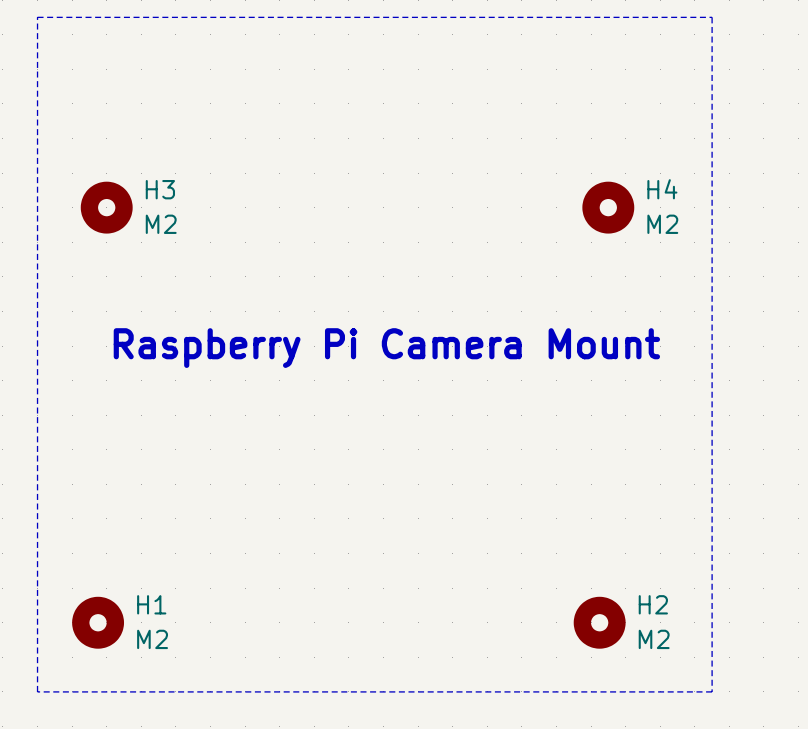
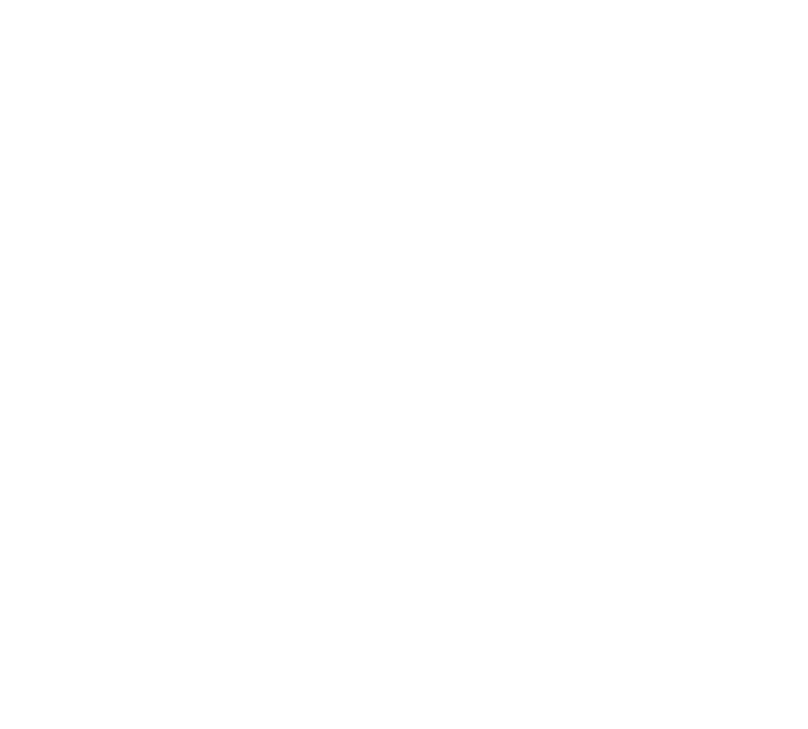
line: (37, 17) (712, 17) (712, 691) (37, 691) (37, 17) -> none
H3: M2 (106, 207) -> none
H4: M2 (608, 207) -> none
text: Raspberry Pi Camera Mount (386, 348) -> none
H1: M2 (98, 622) -> none
H2: M2 (599, 622) -> none

